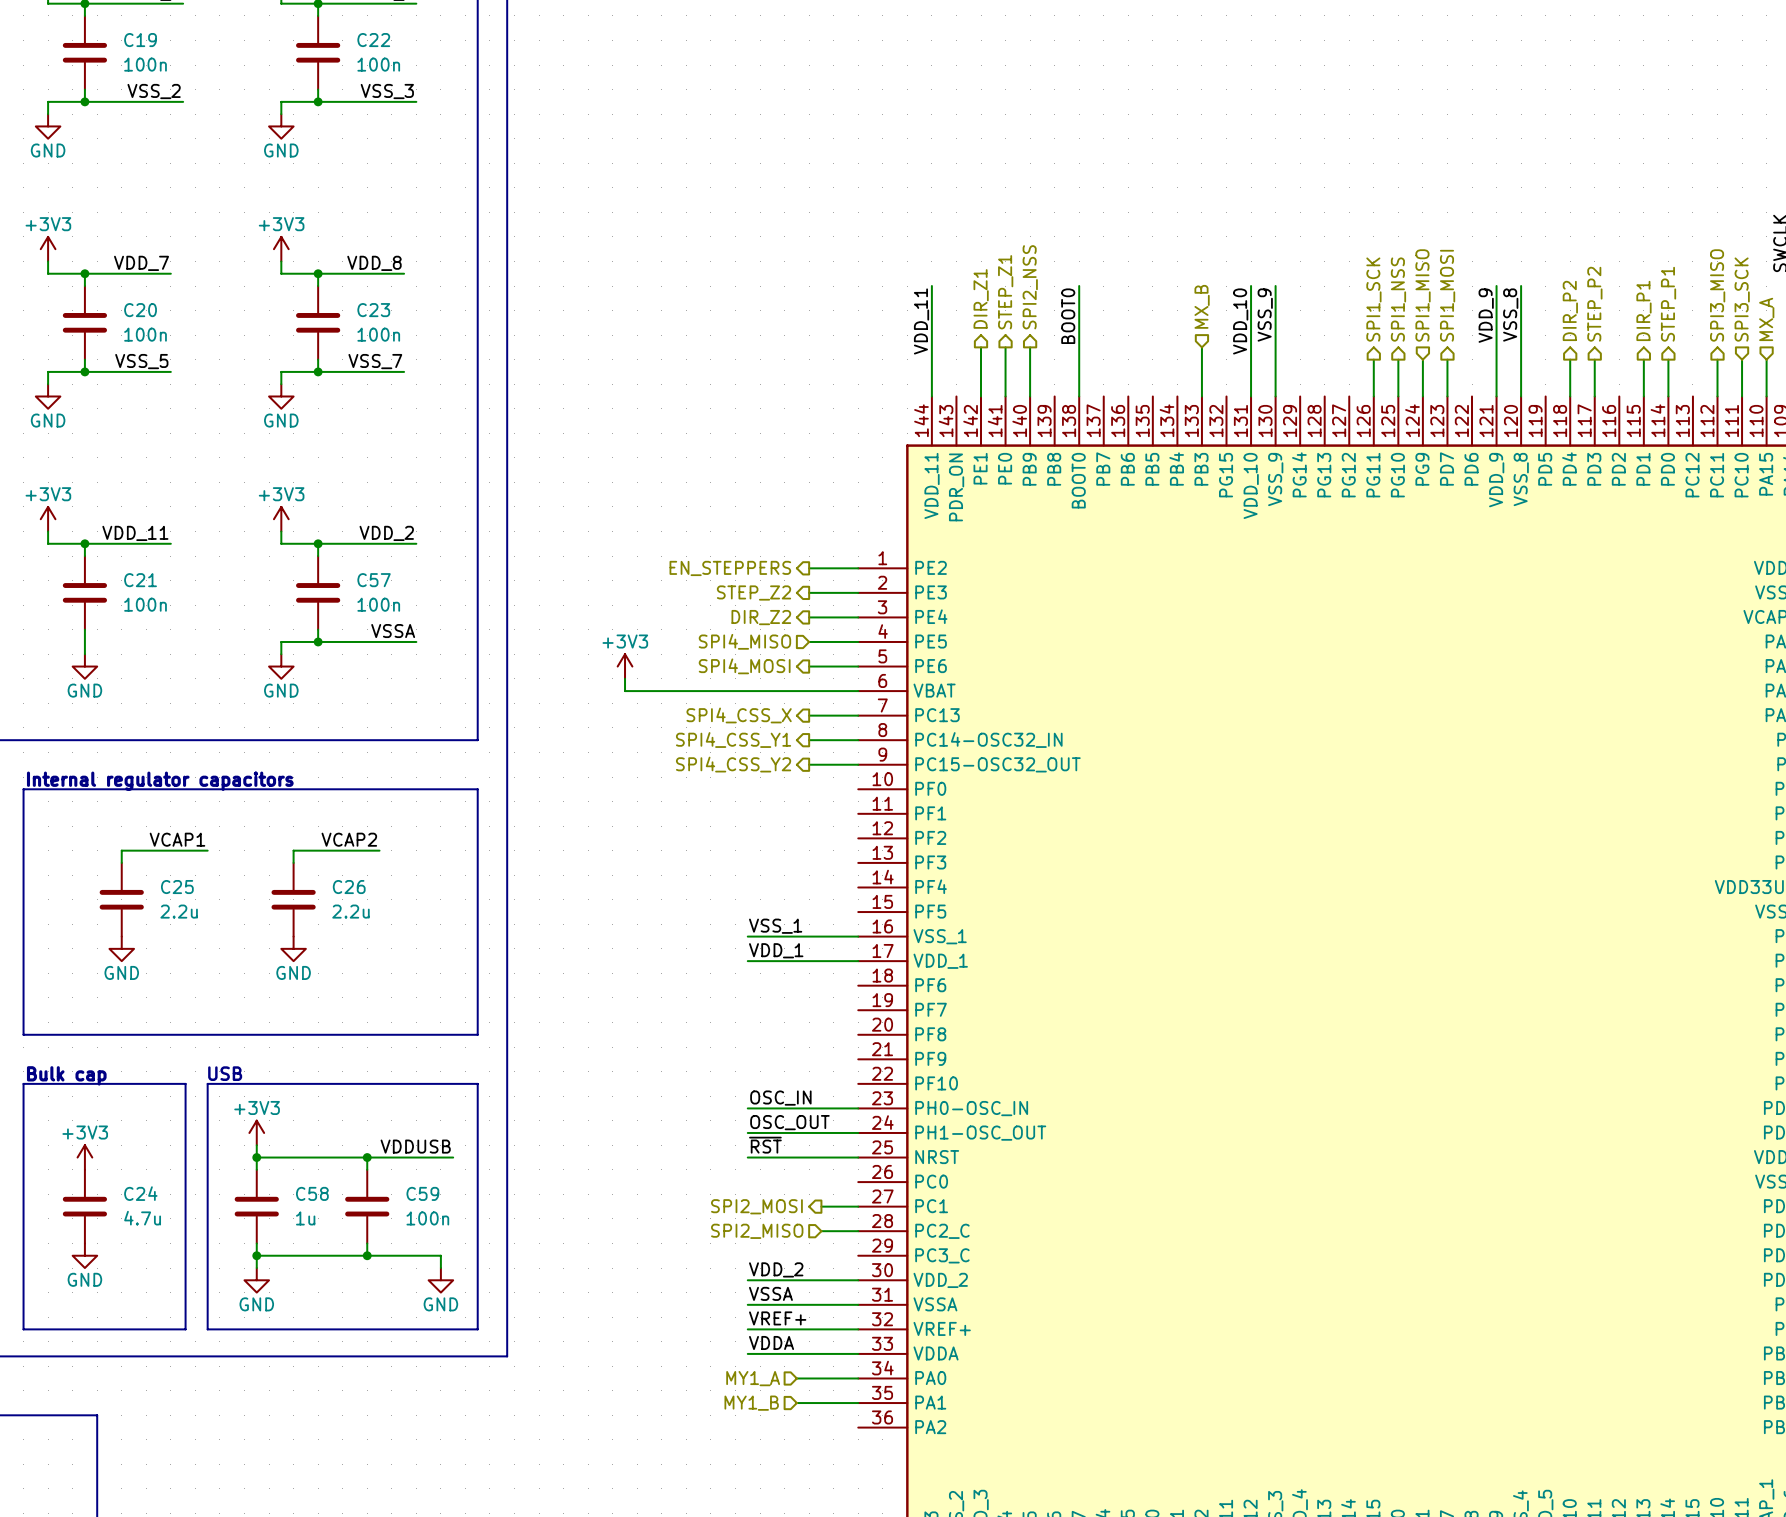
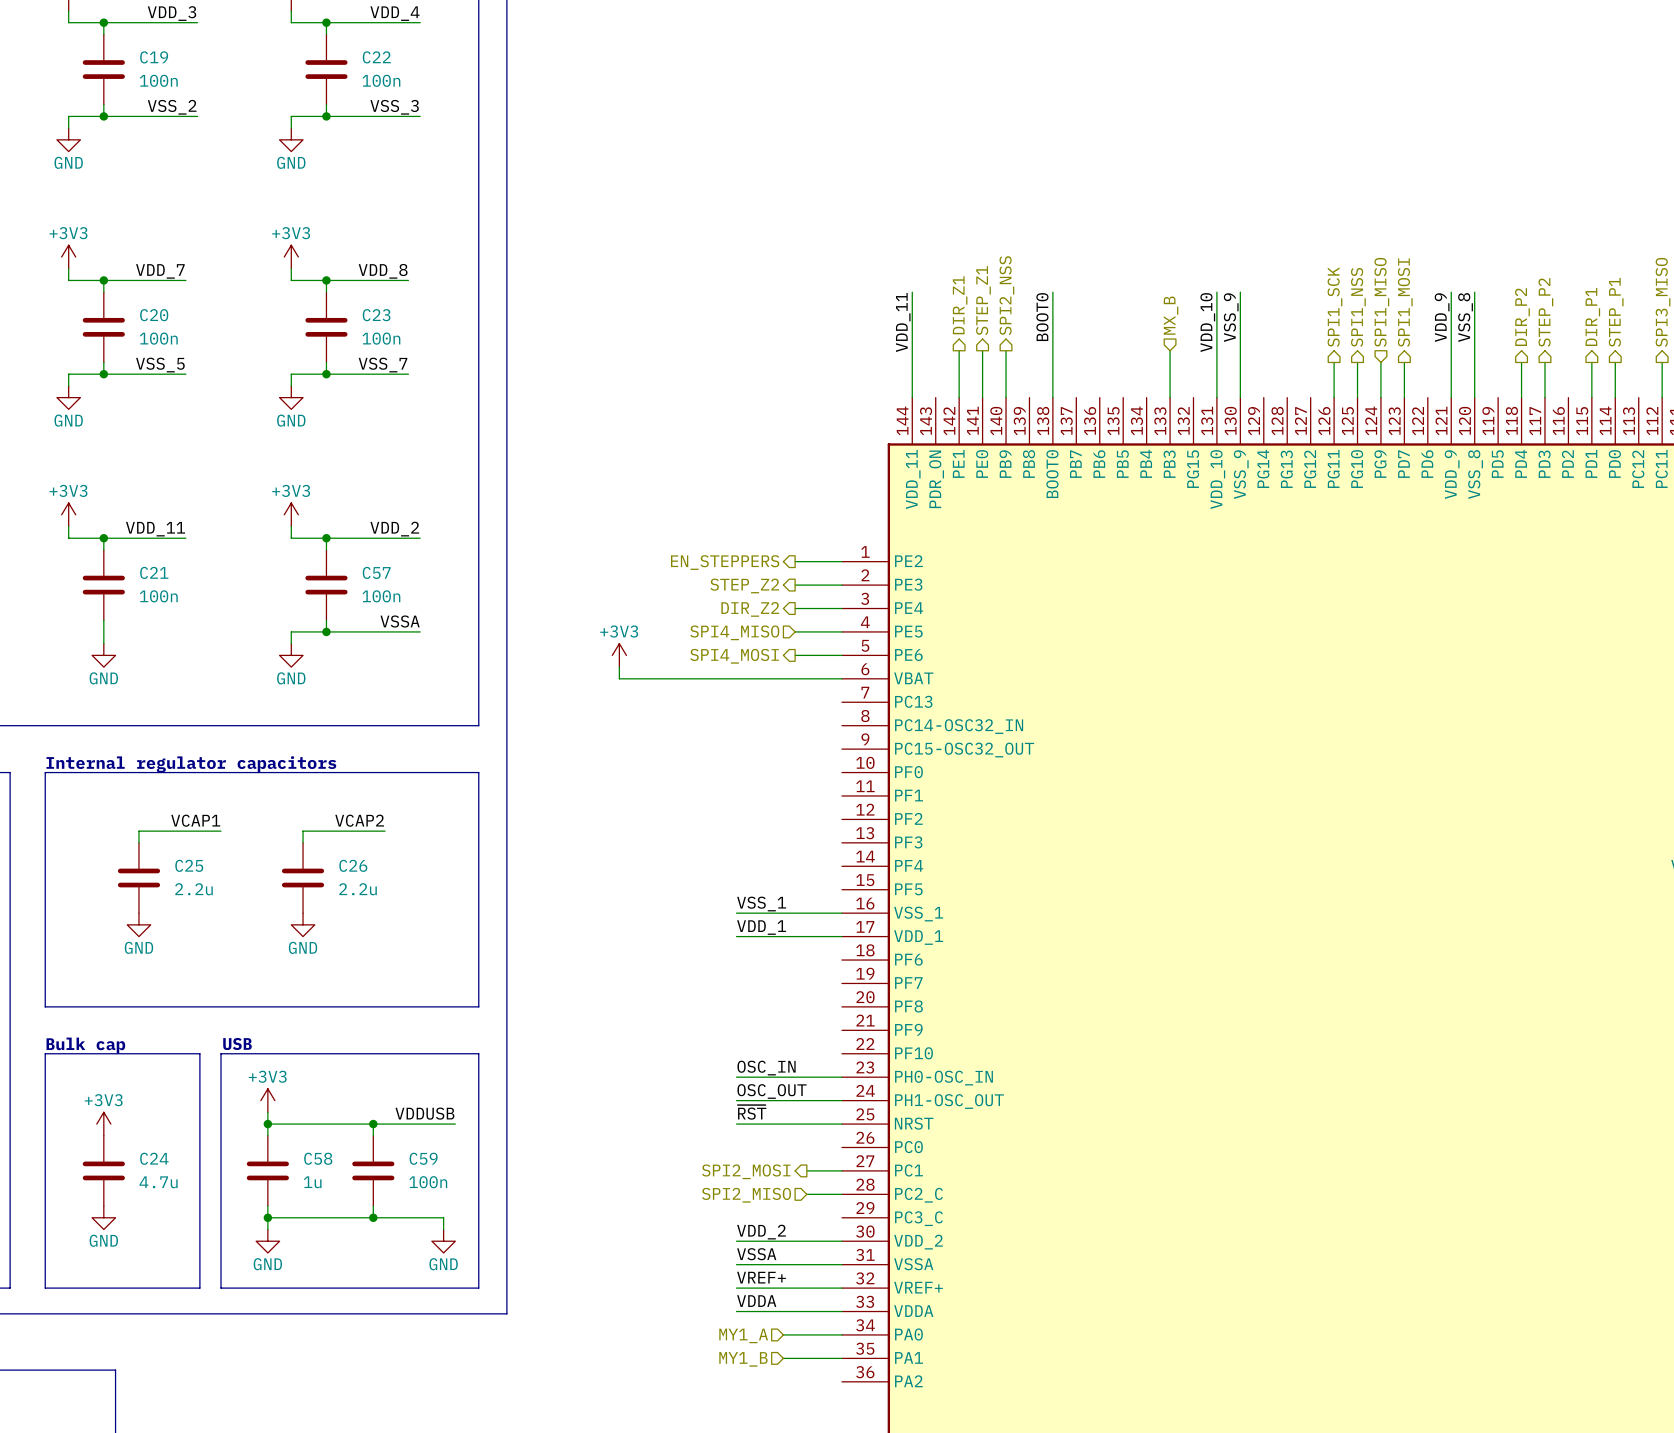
hierarchical label: SPI4_CSS_X (739, 715) -> none
wire: (809, 715) (858, 715) -> none
hierarchical label: SPI4_CSS_Y1 (733, 740) -> none
wire: (809, 740) (858, 740) -> none
hierarchical label: SPI4_CSS_Y2 (733, 764) -> none
wire: (809, 764) (858, 764) -> none

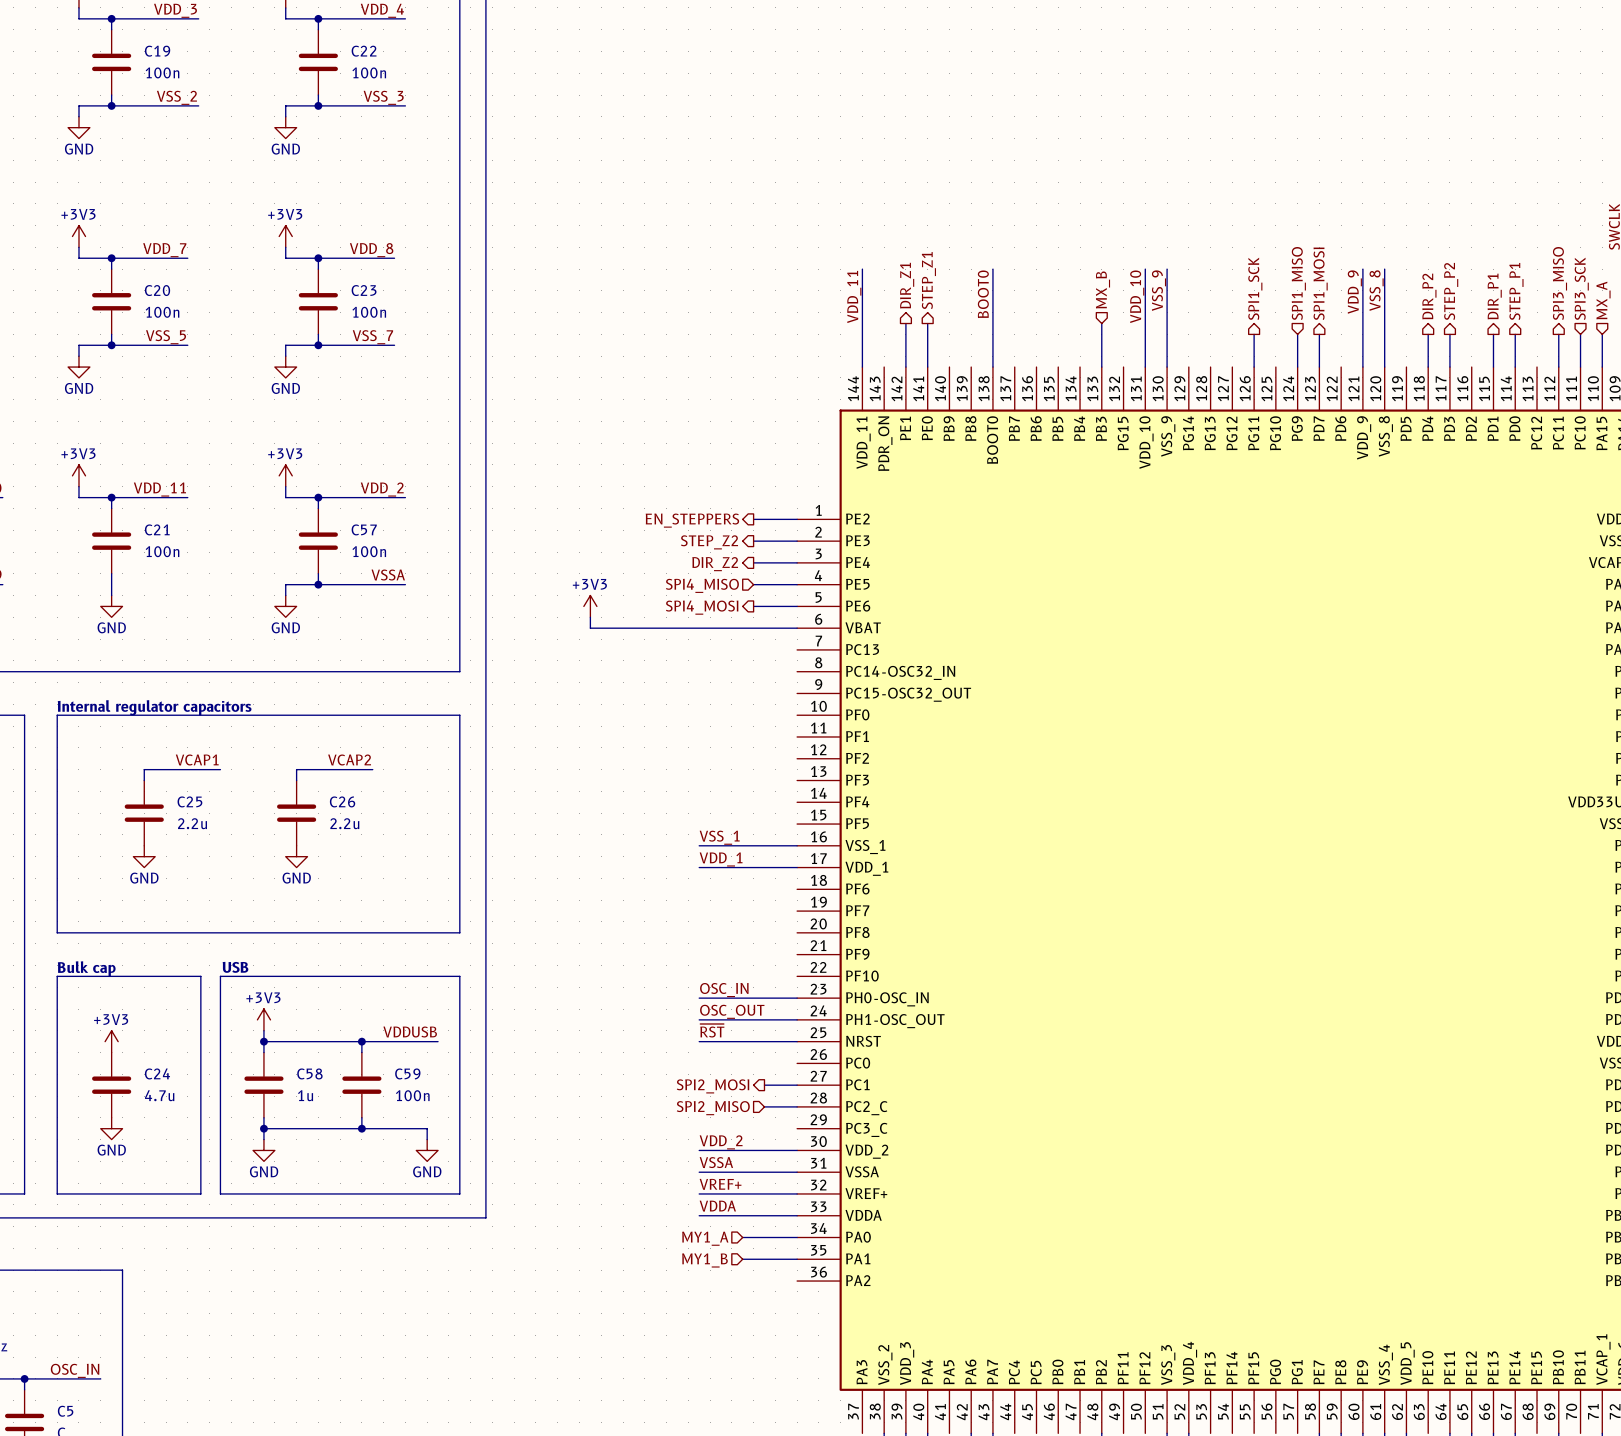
hierarchical label: SPI2_NSS (1006, 295) -> none
hierarchical label: SPI1_NSS (1358, 307) -> none
wire: (1006, 350) (1006, 397) -> none
wire: (1357, 362) (1357, 397) -> none

